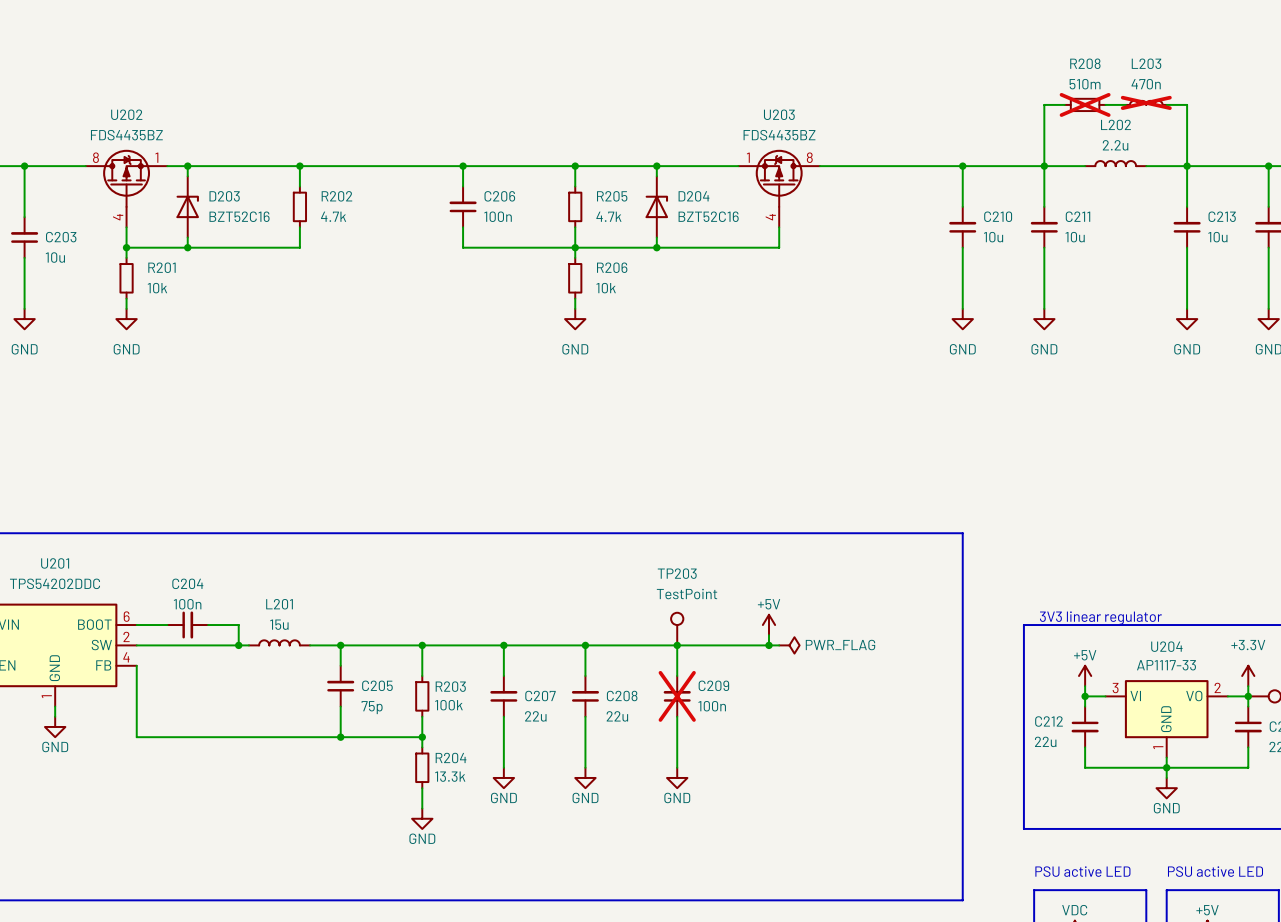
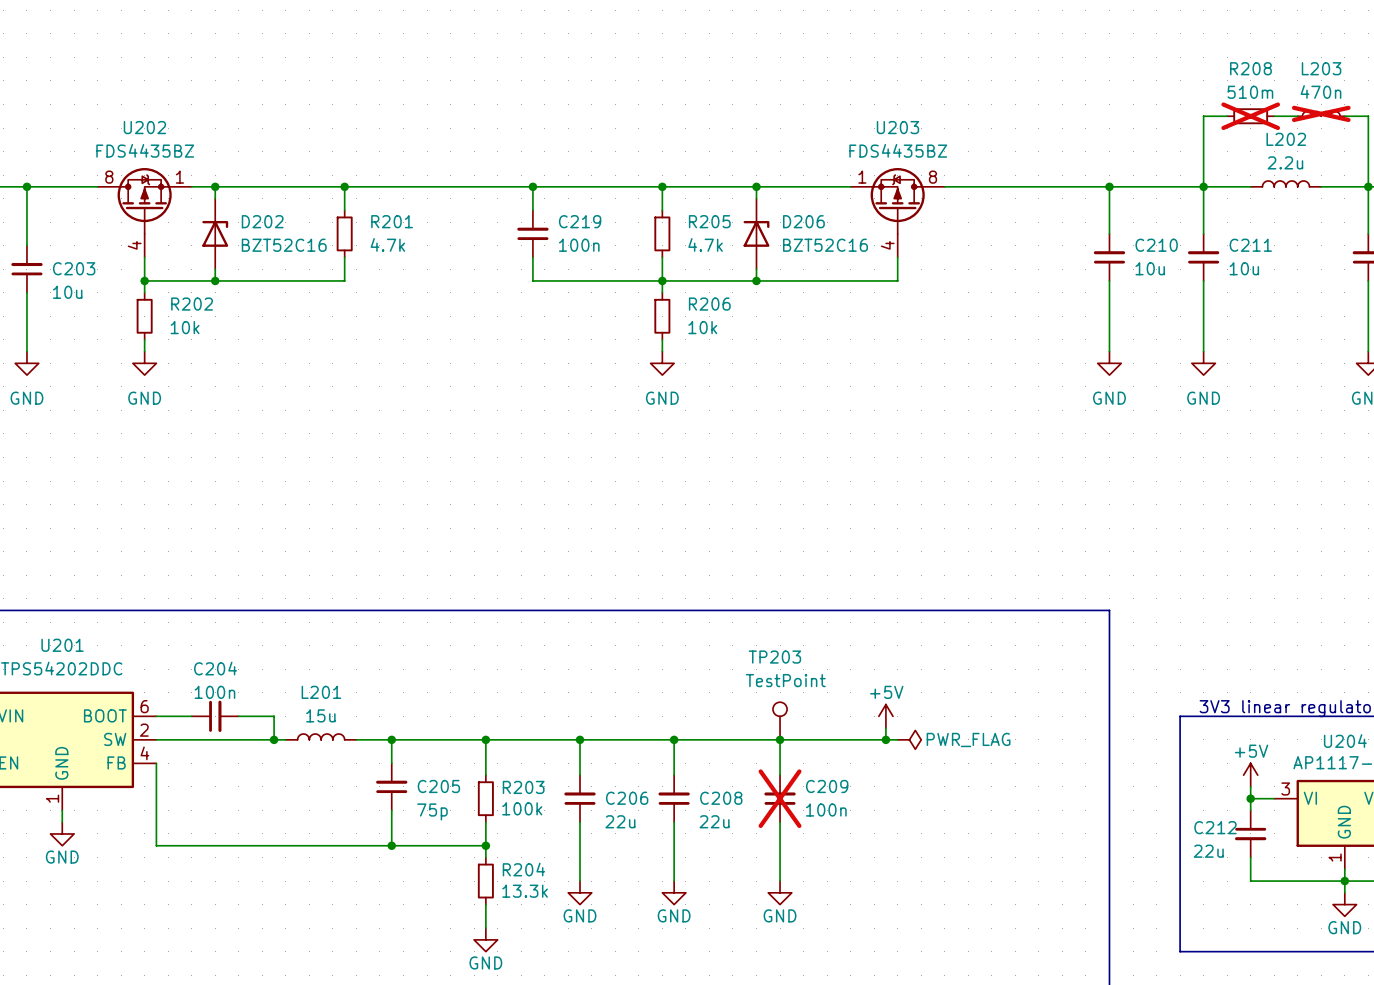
D203 name: D203 (224, 196) -> D202 (262, 221)
R202 name: R202 (336, 196) -> R201 (392, 221)
C206 name: C206 (499, 196) -> C219 (580, 221)
D204 name: D204 (693, 196) -> D206 (803, 221)
R201 name: R201 (161, 267) -> R202 (192, 304)
C207 name: C207 (540, 696) -> C206 (627, 798)

